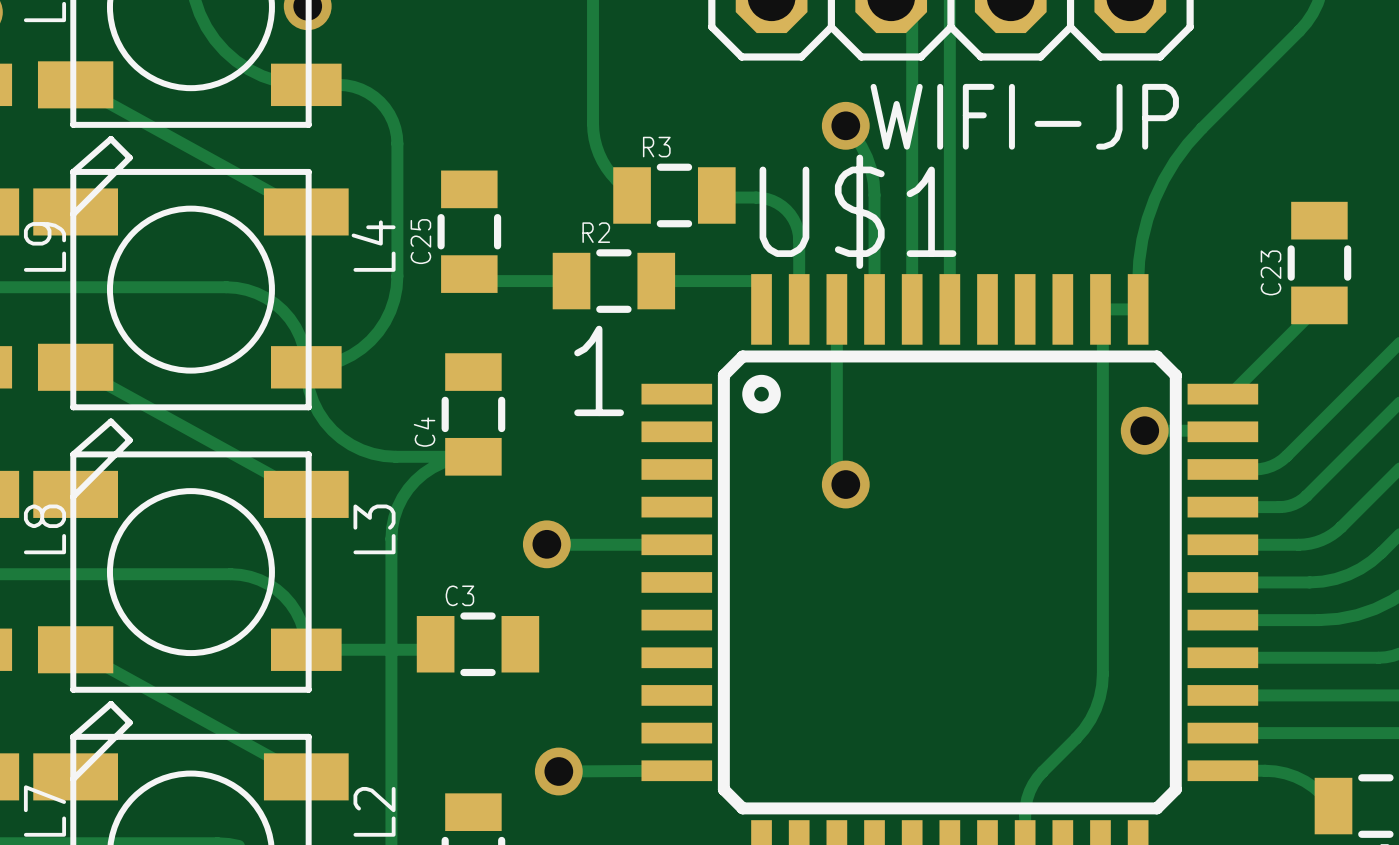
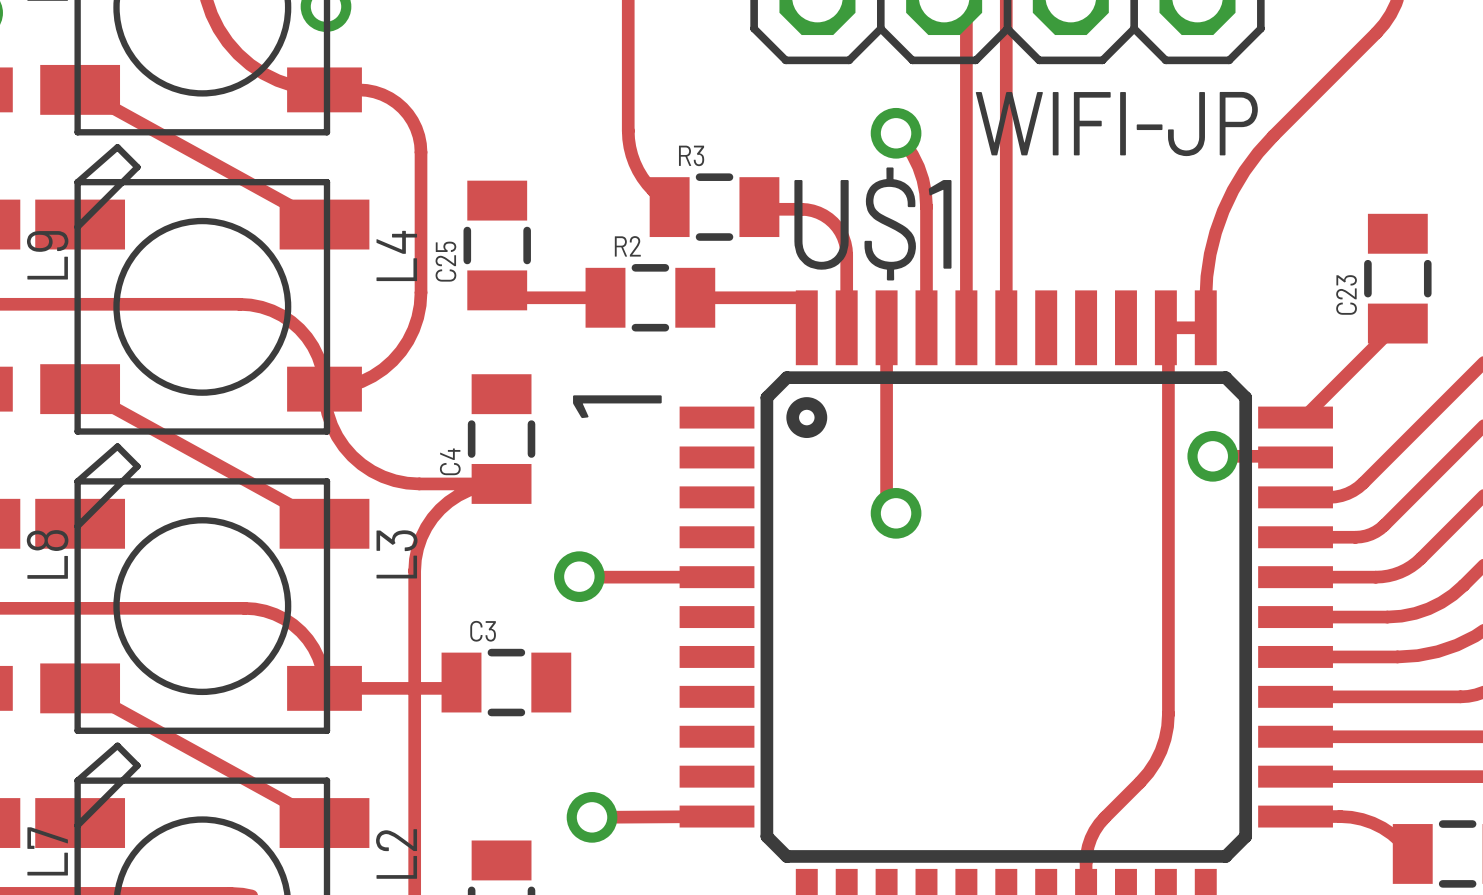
text rotation: 0° (599, 370) -> 90° counterclockwise (617, 406)

